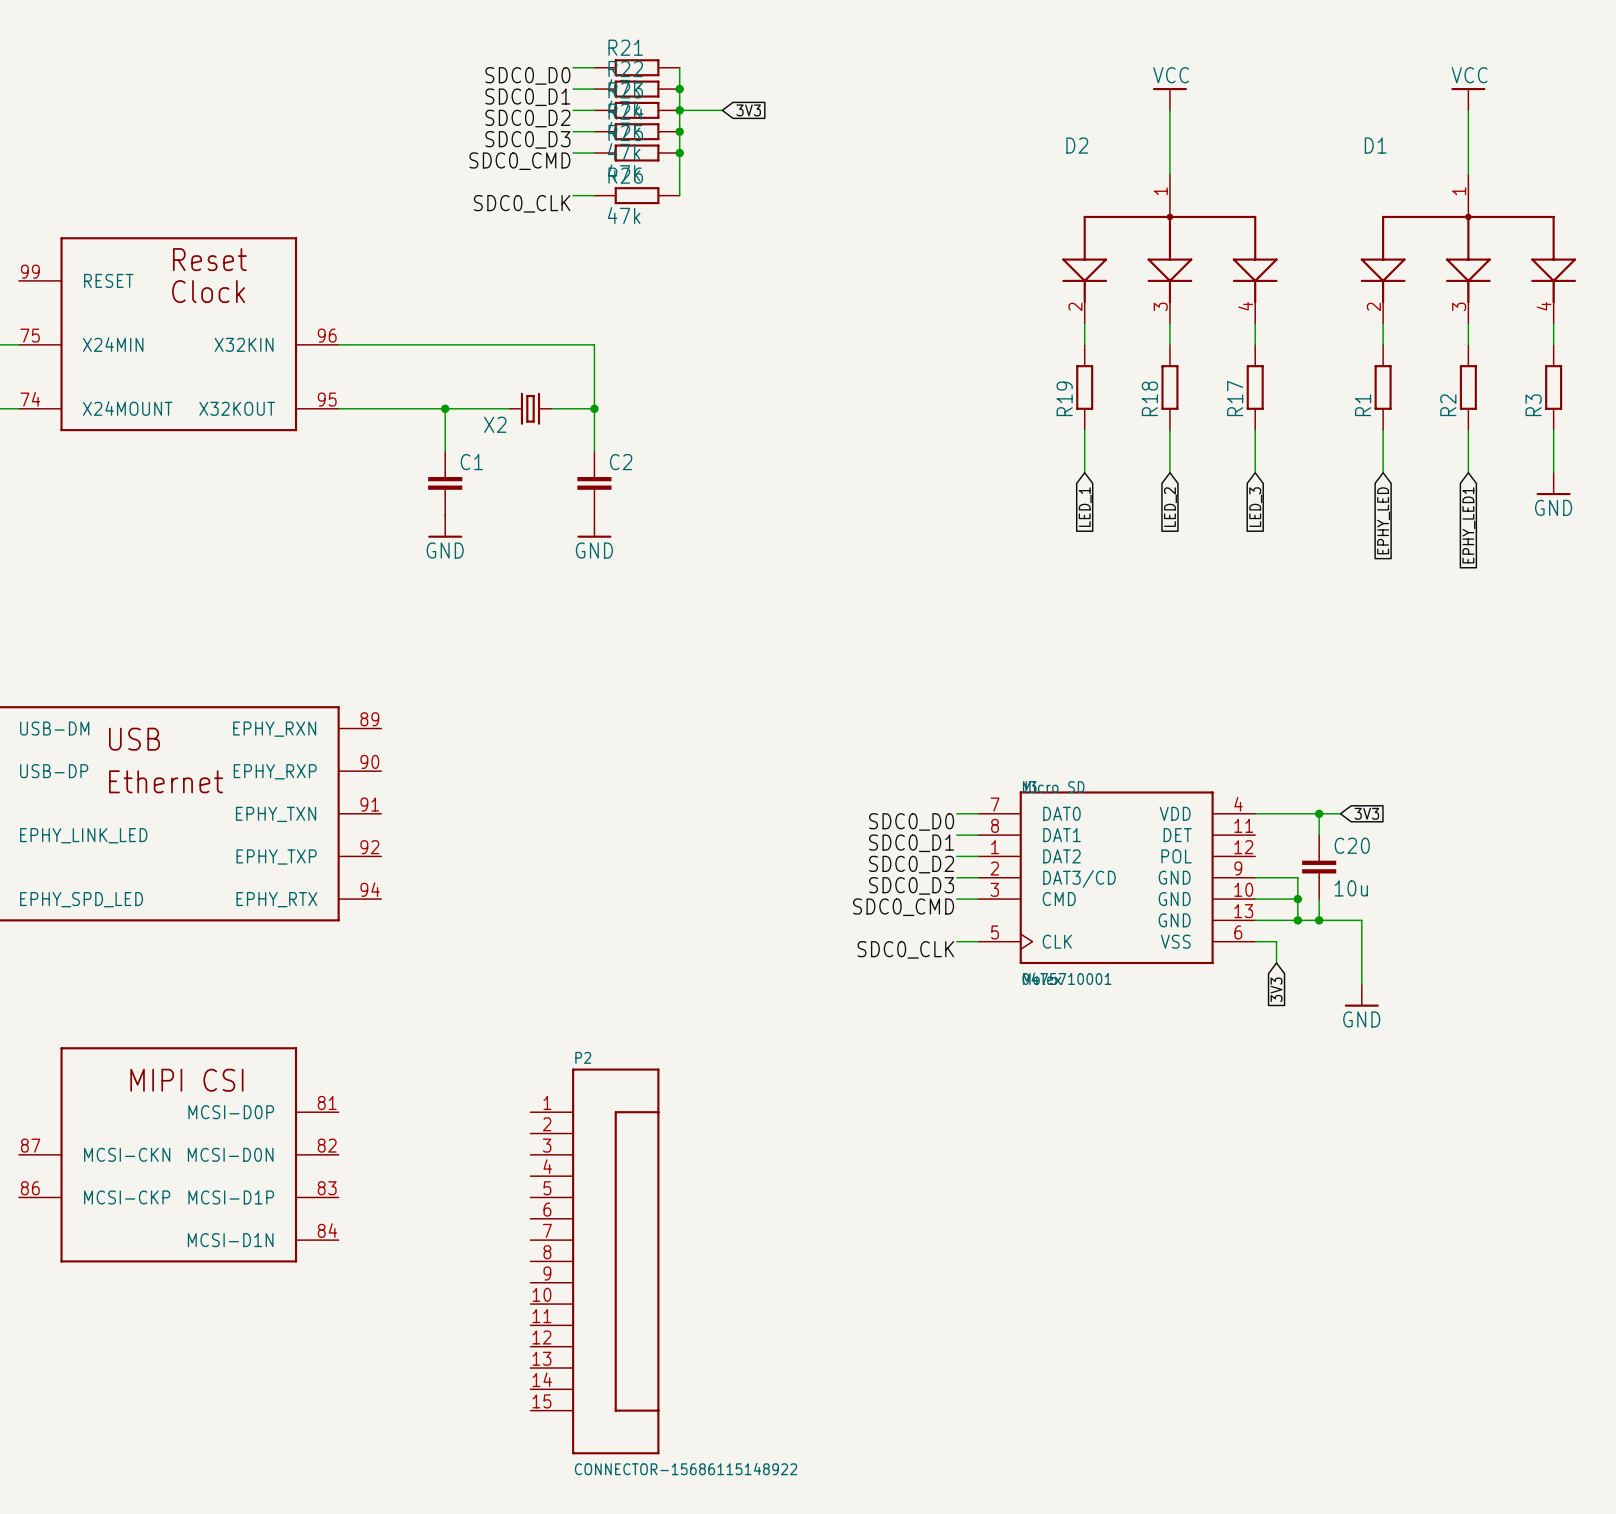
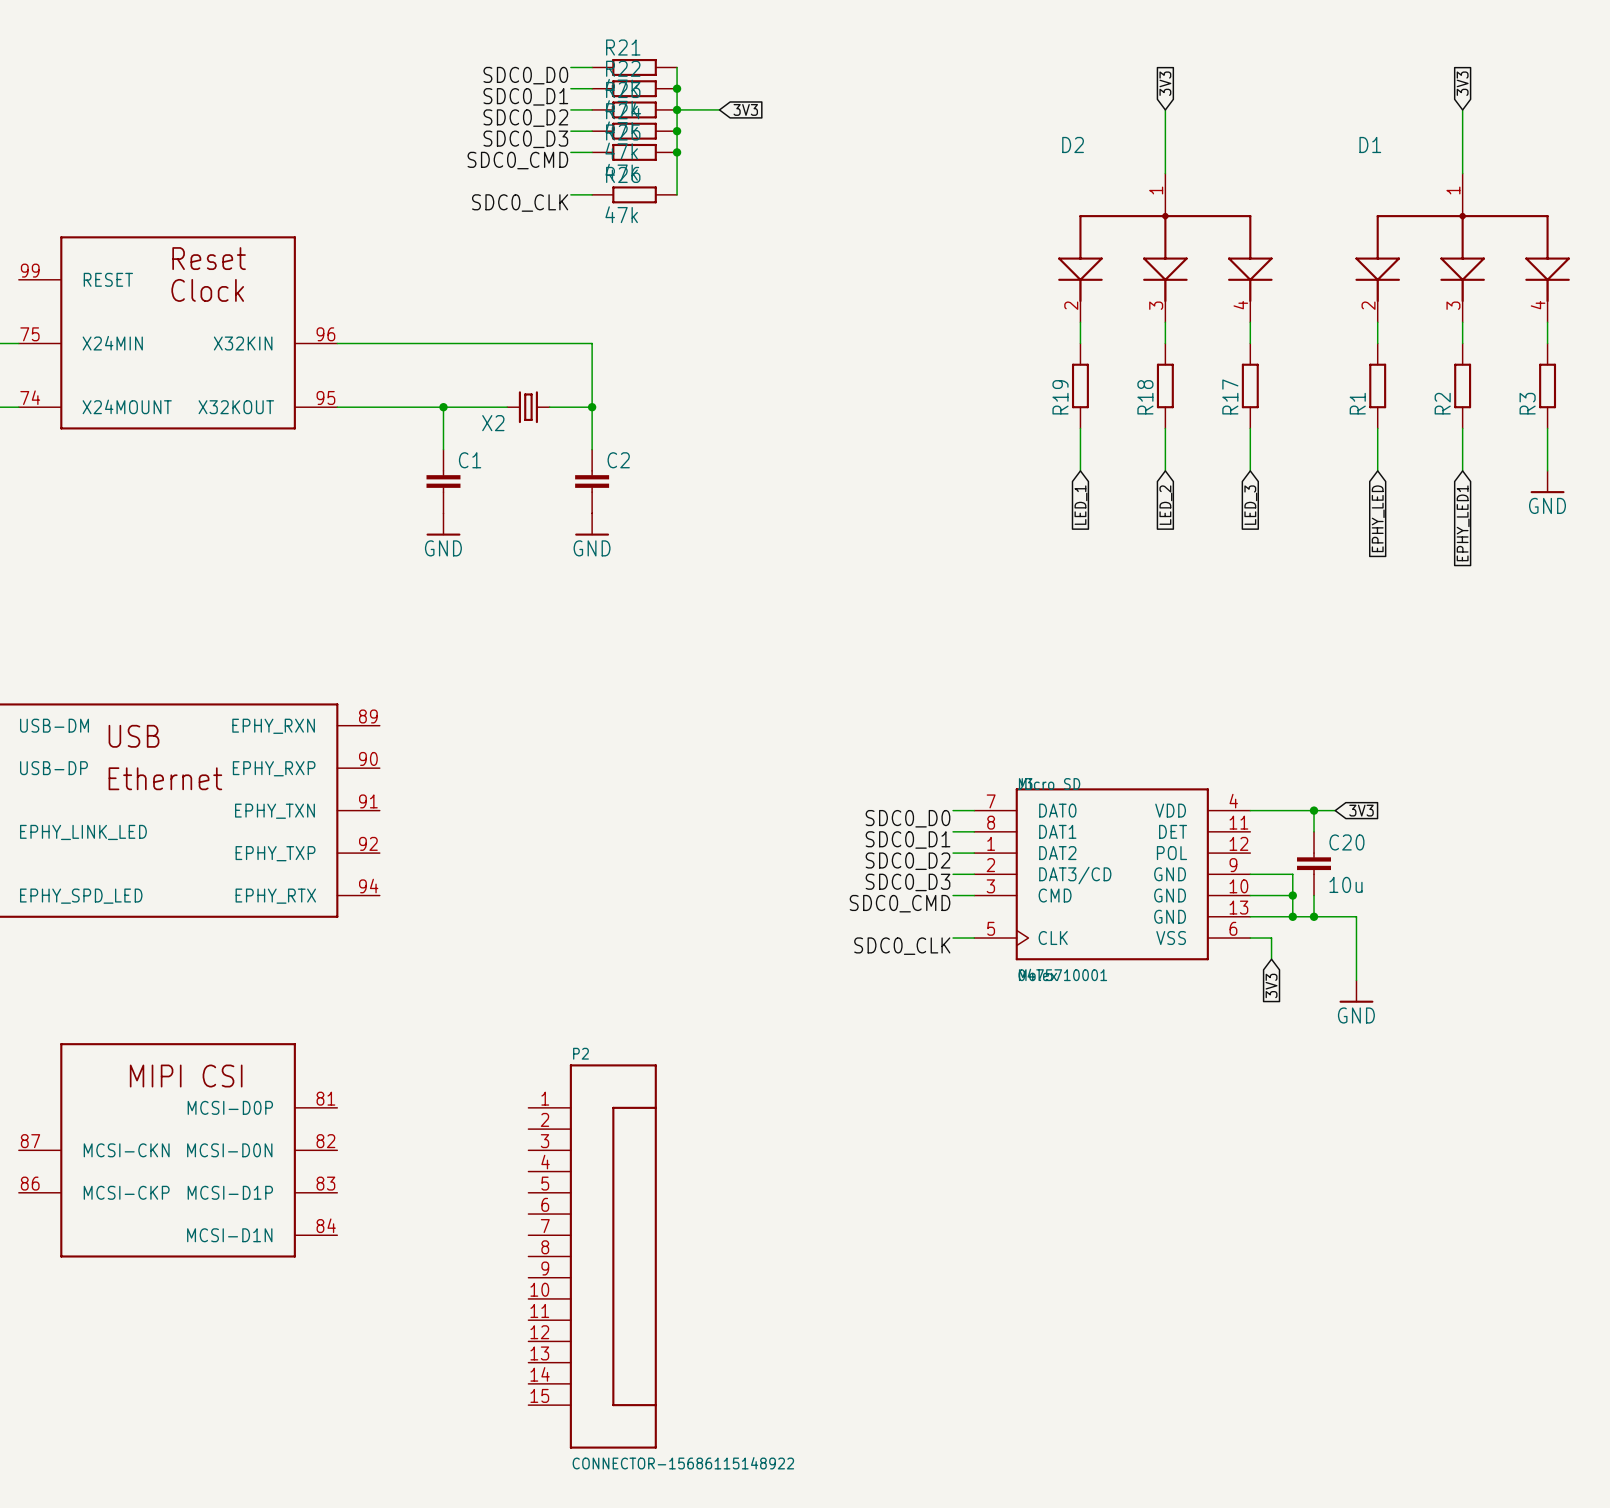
global label: none -> 3V3 (1165, 83)
global label: none -> 3V3 (1462, 83)
power symbol: VCC (1169, 99) -> none
power symbol: VCC (1468, 99) -> none

